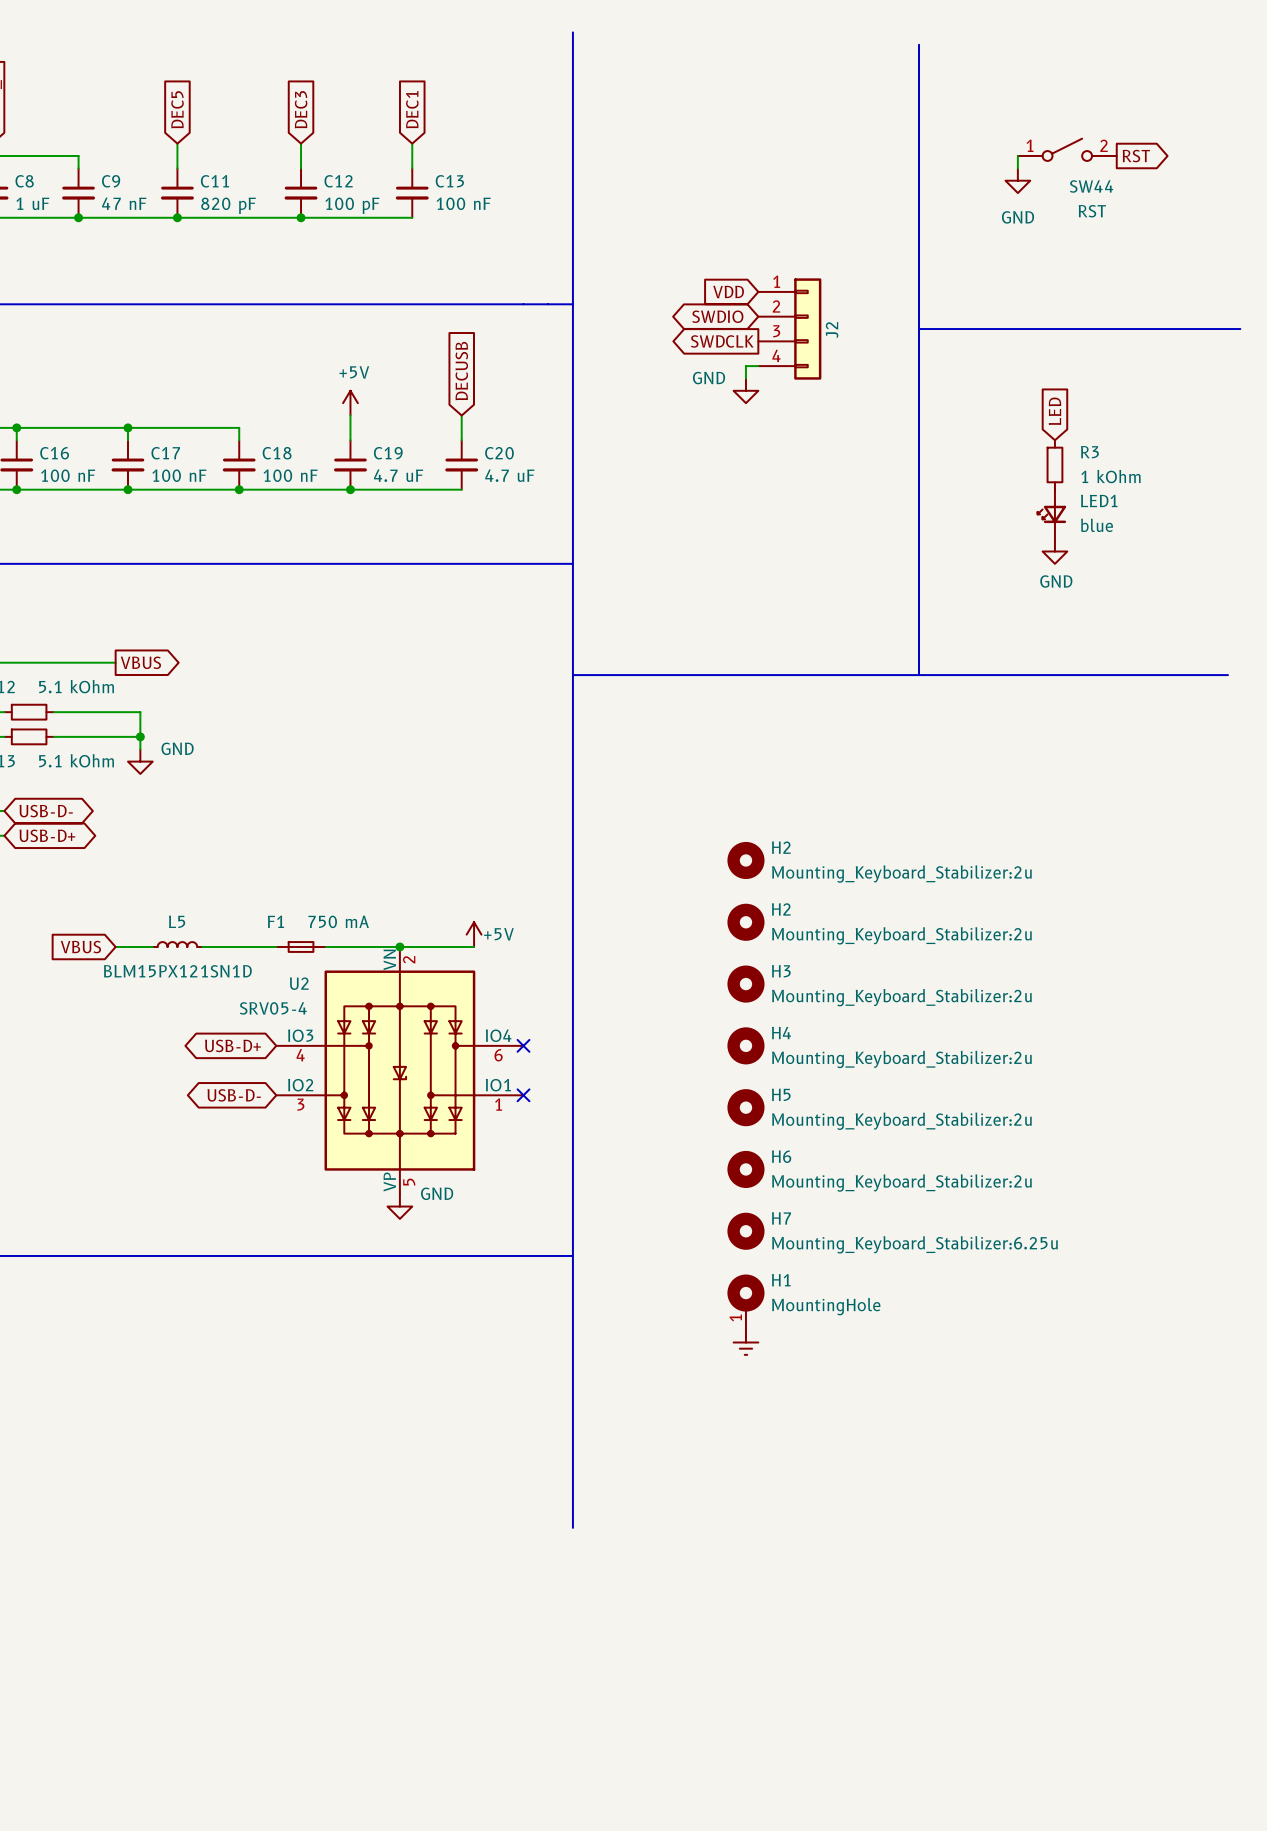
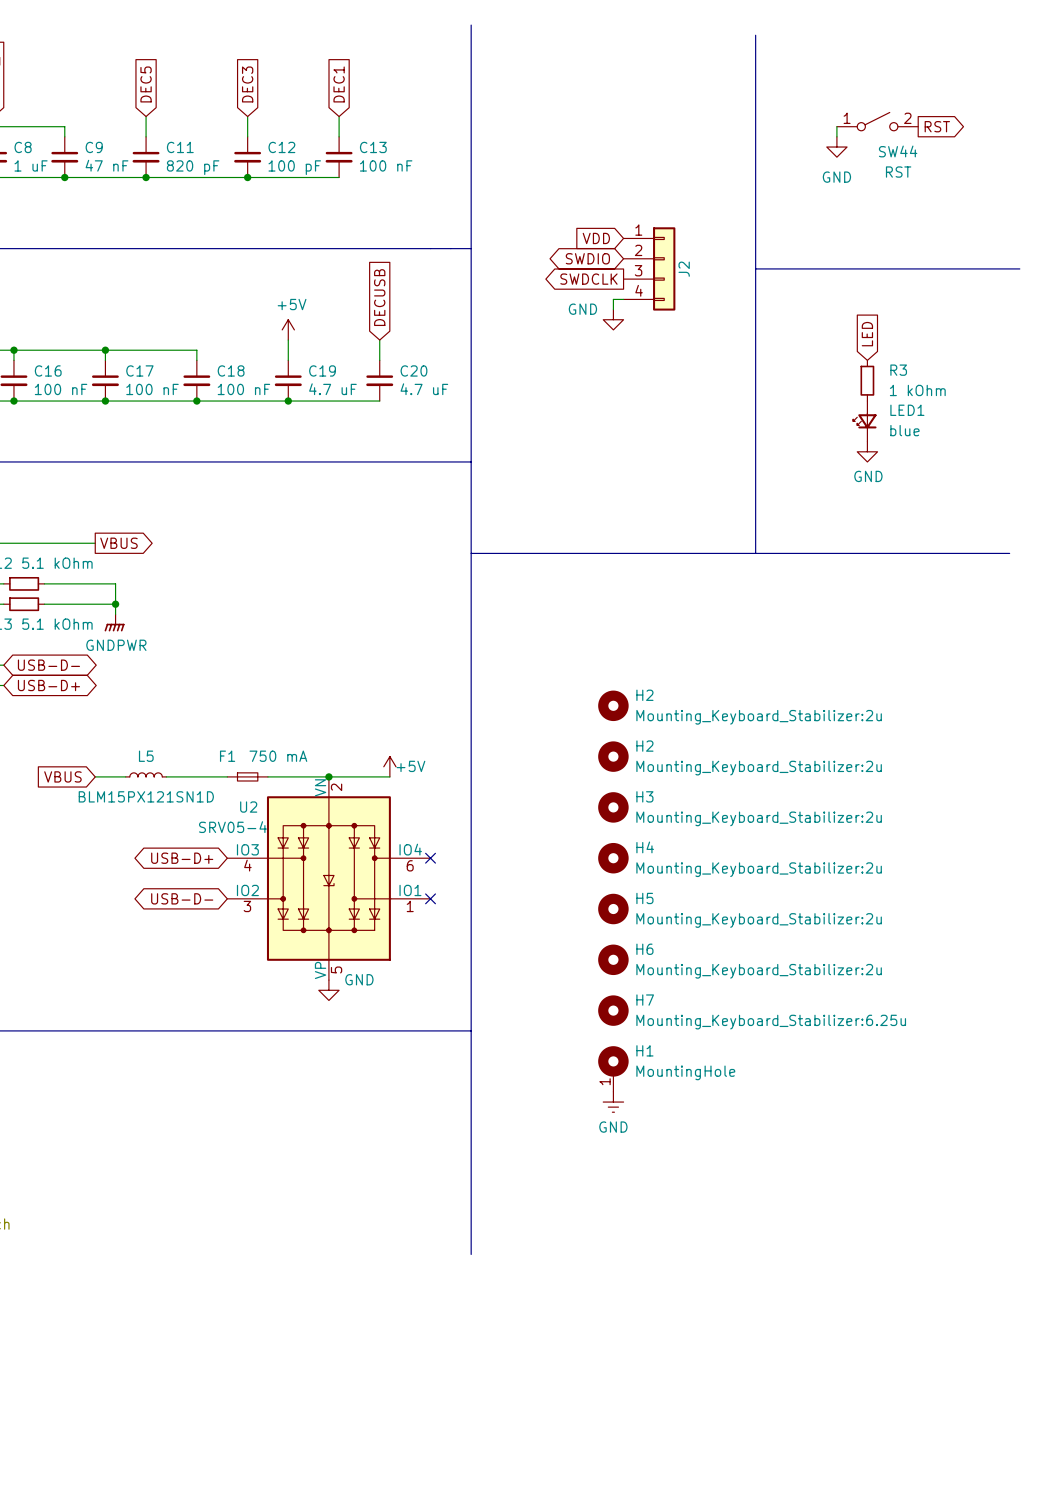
power symbol: GND (140, 761) -> GNDPWR (114, 622)
power symbol text: none -> GND (613, 1127)

